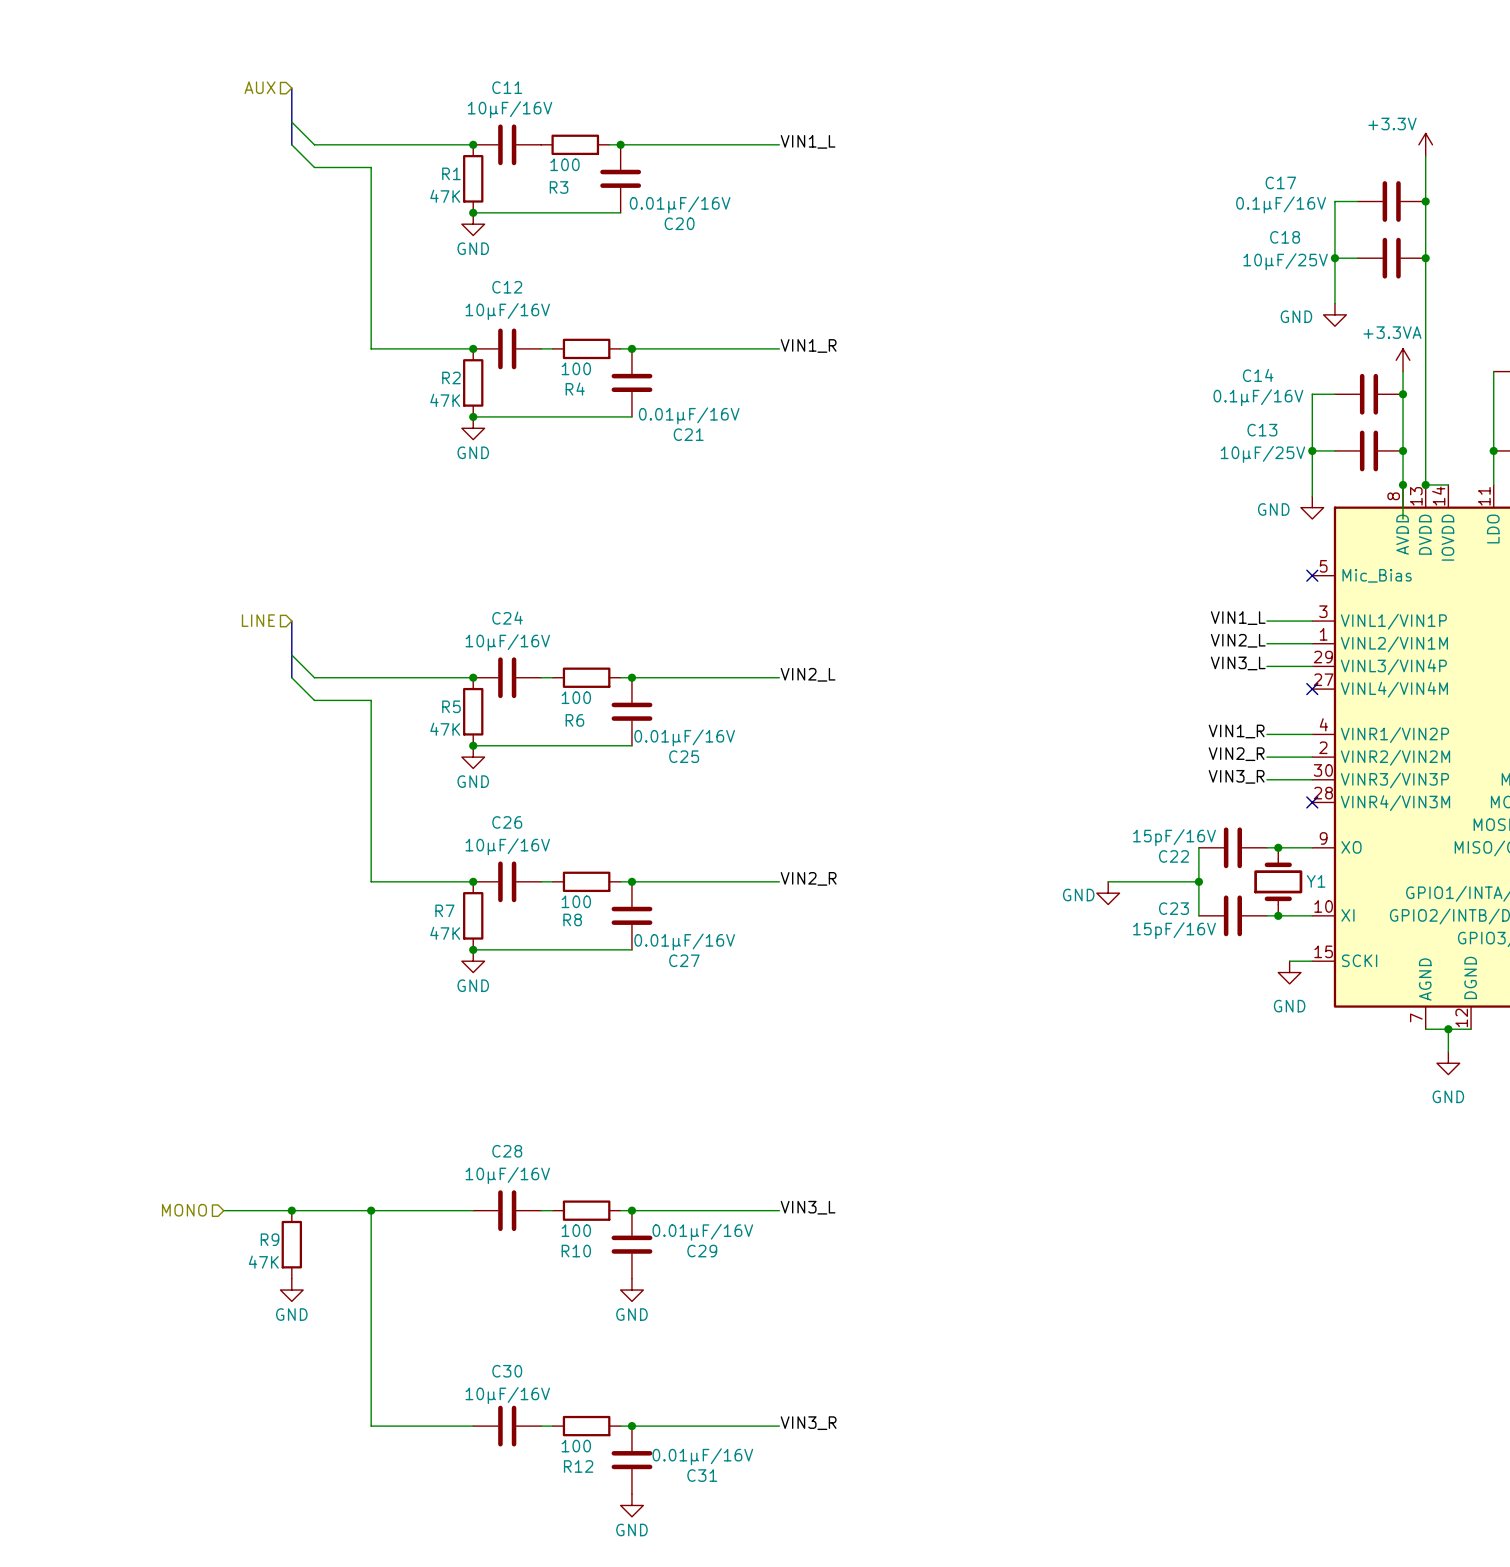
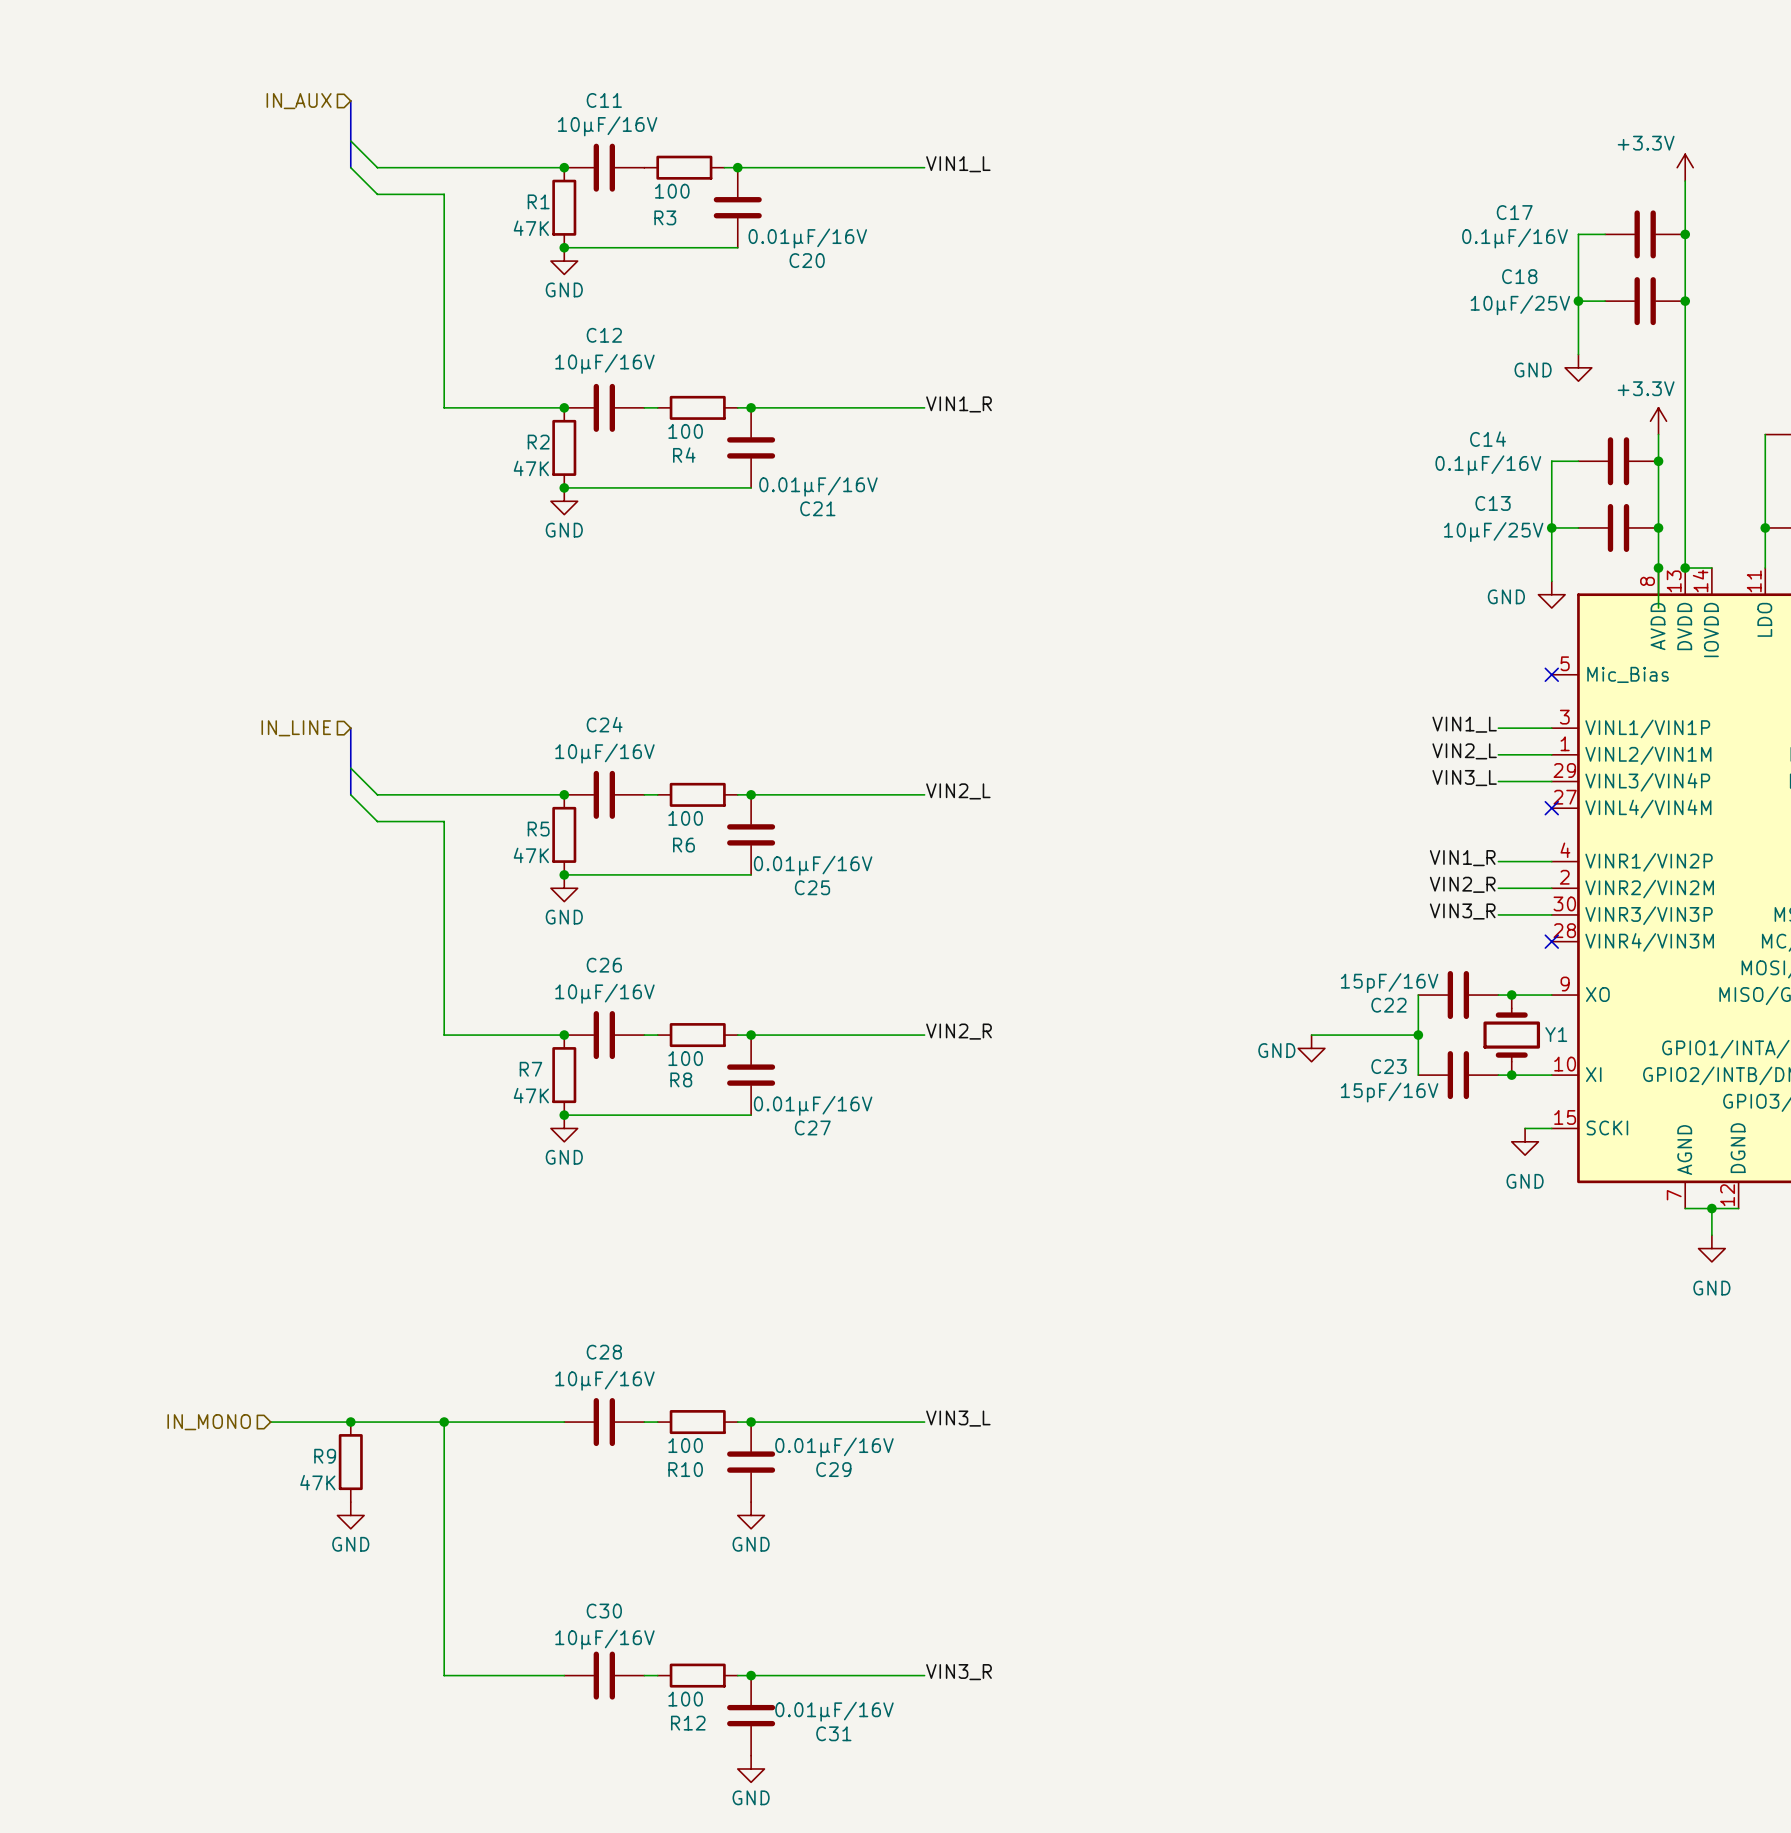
hierarchical label: AUX (260, 87) -> IN_AUX (299, 101)
power symbol: +3.3VA (1403, 360) -> +3.3V (1658, 421)
hierarchical label: LINE (258, 620) -> IN_LINE (296, 728)
hierarchical label: MONO (184, 1210) -> IN_MONO (209, 1422)

